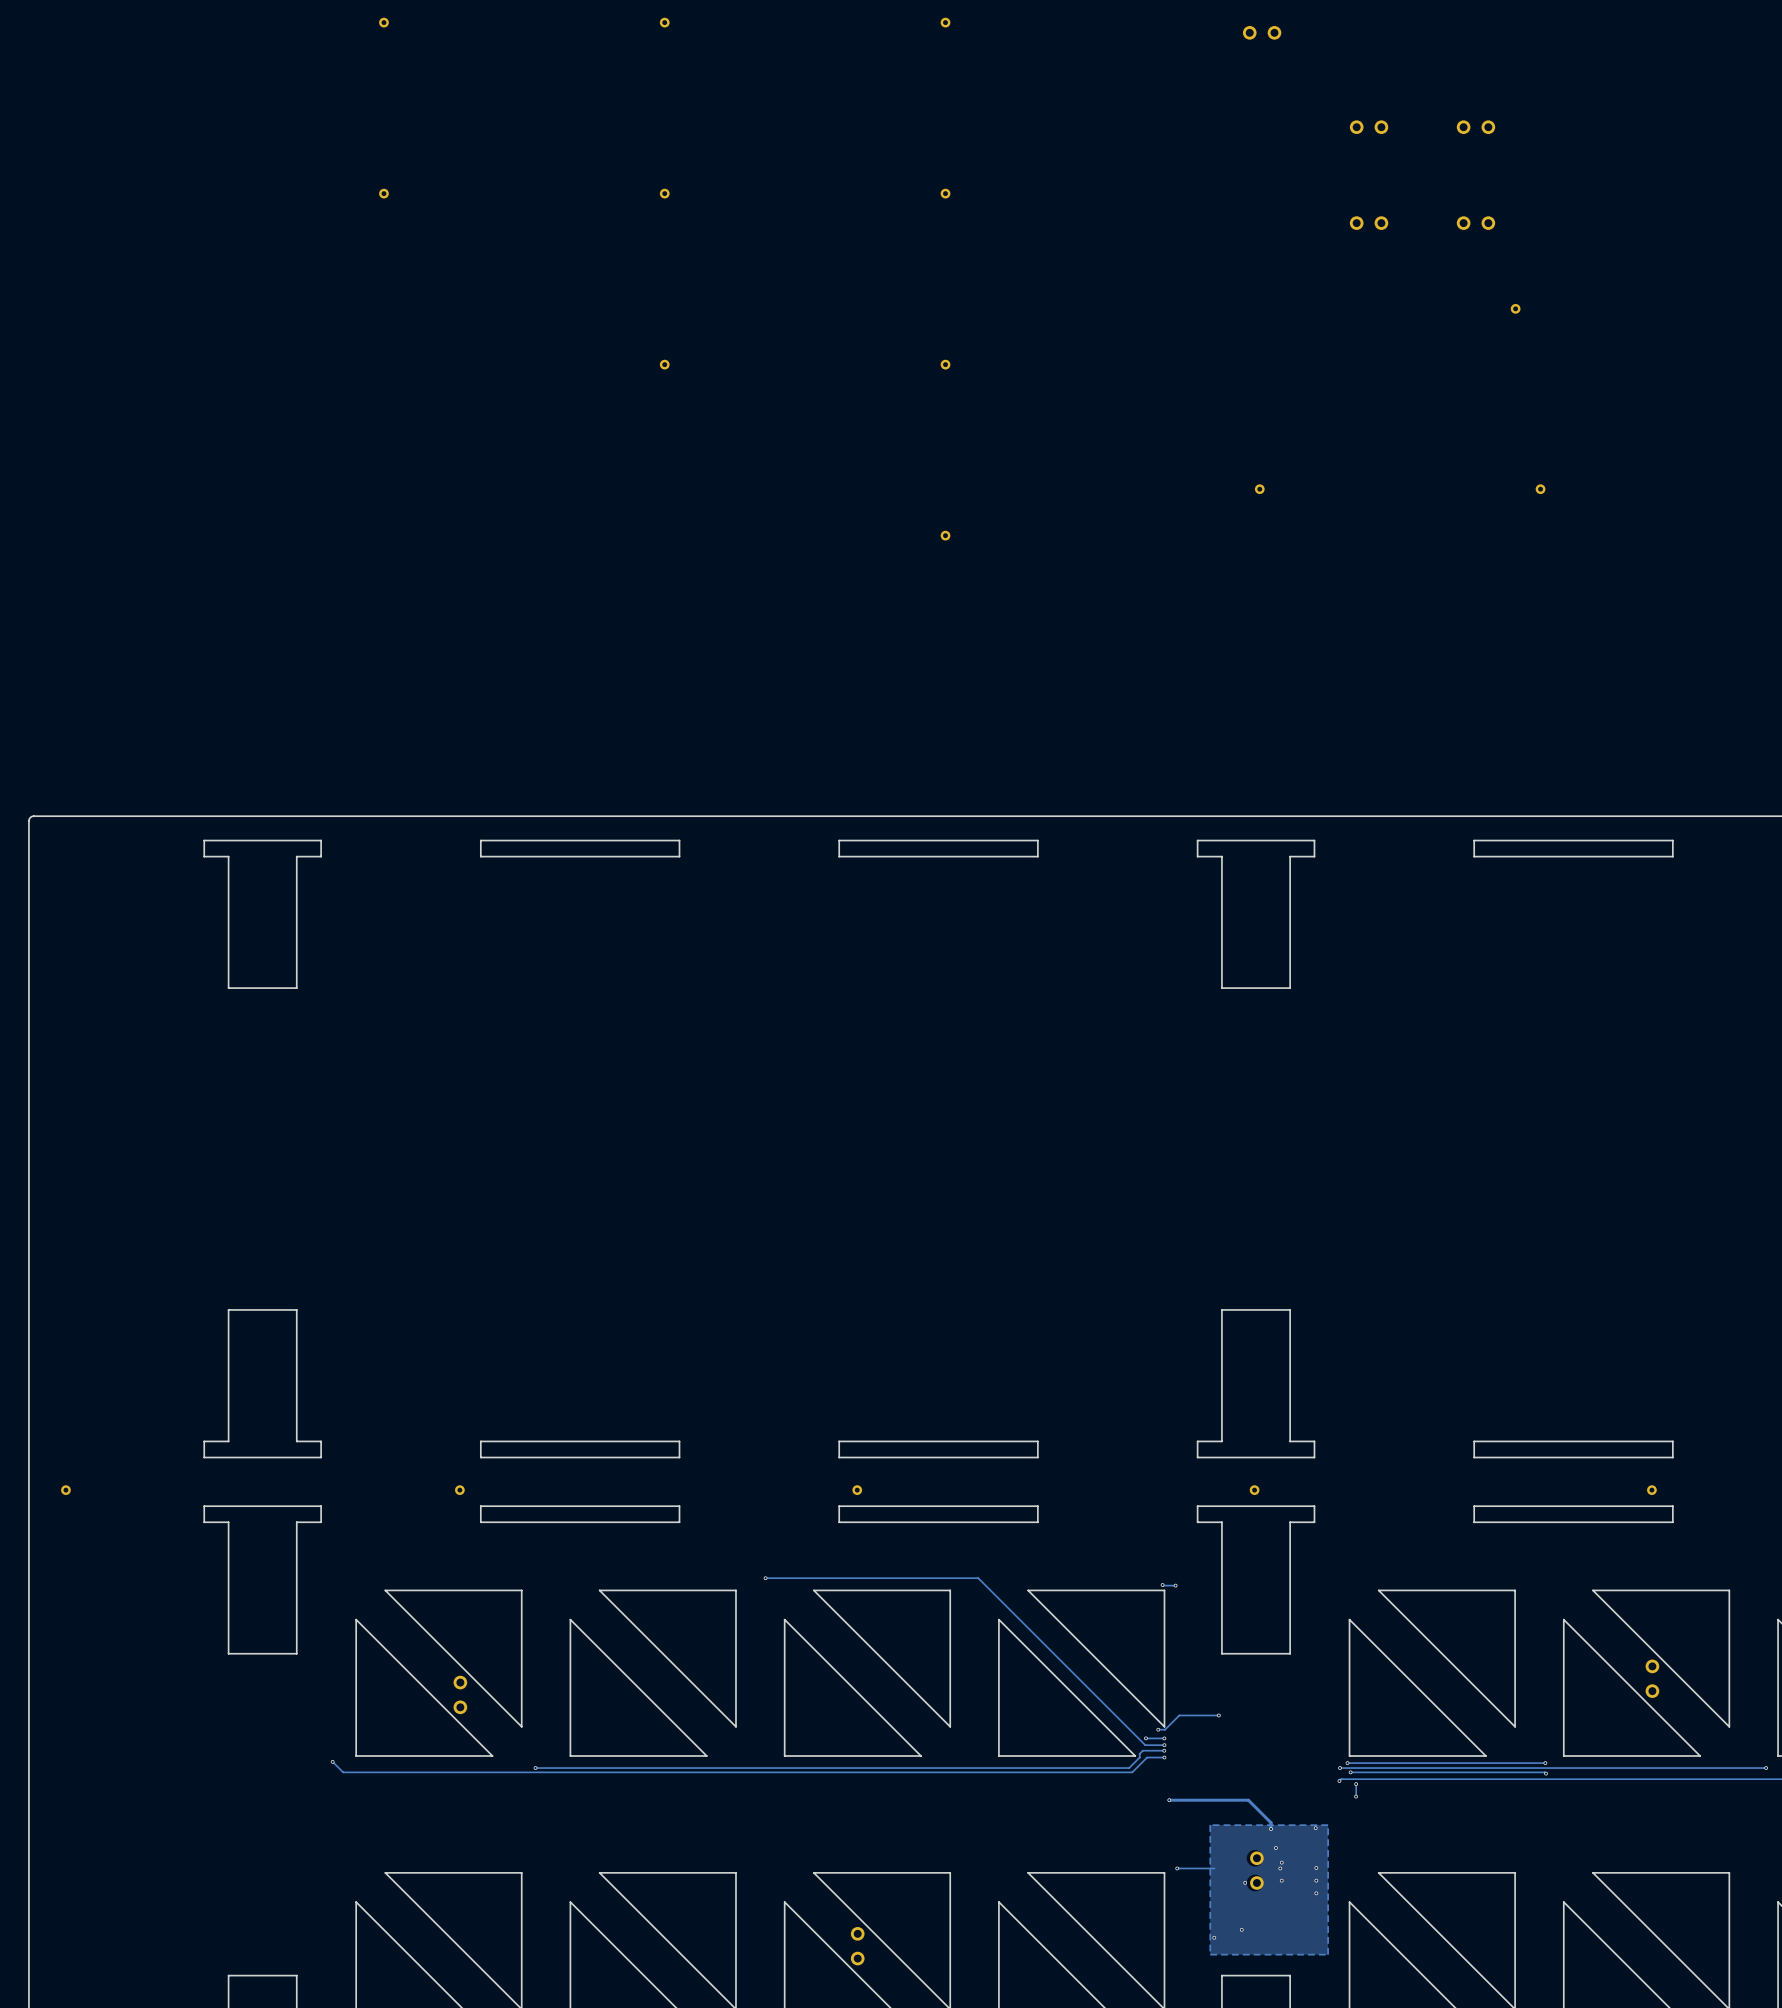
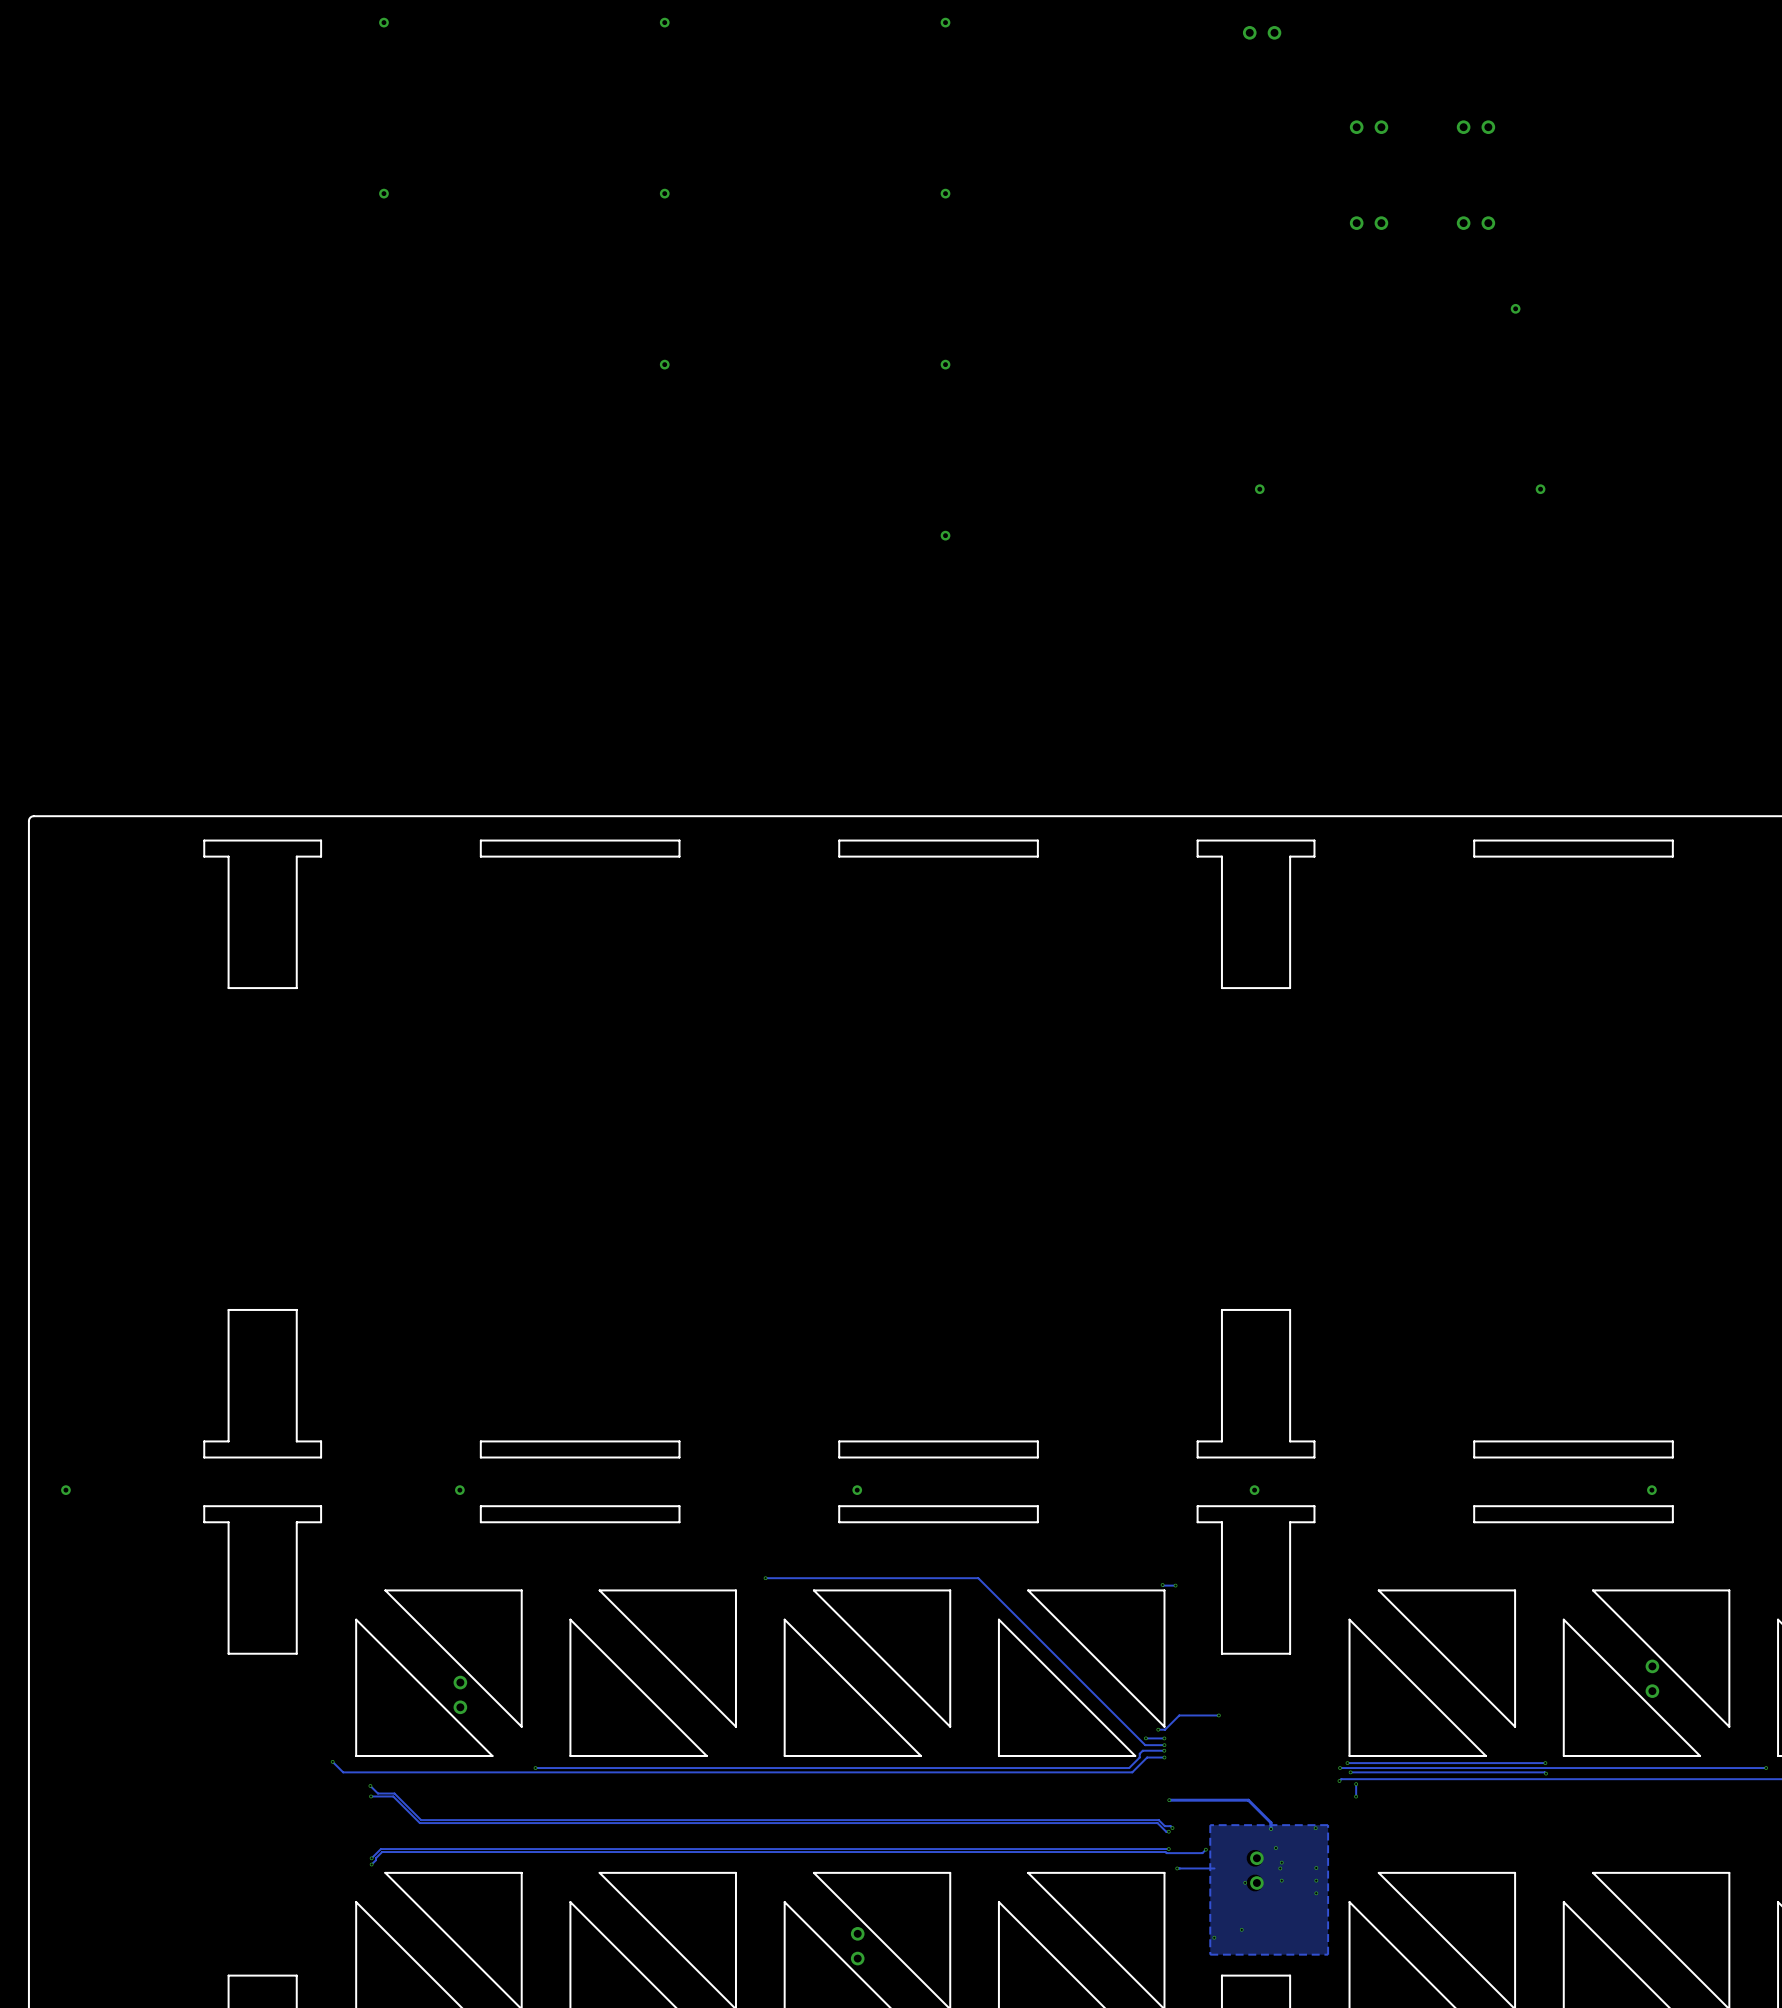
track: none -> (370, 1785) (377, 1793) (394, 1793) (421, 1820) (1158, 1820) (1164, 1826) (1172, 1828)
via: none -> (370, 1785)
track: none -> (371, 1796) (393, 1796) (419, 1823) (1157, 1823) (1166, 1831) (1168, 1831)
via: none -> (371, 1796)
via: none -> (1172, 1828)
via: none -> (1168, 1831)
track: none -> (1168, 1849) (380, 1849) (371, 1858)
via: none -> (1168, 1849)
track: none -> (1205, 1849) (1202, 1853) (382, 1852) (371, 1864)
via: none -> (1205, 1849)
via: none -> (371, 1858)
via: none -> (371, 1864)

